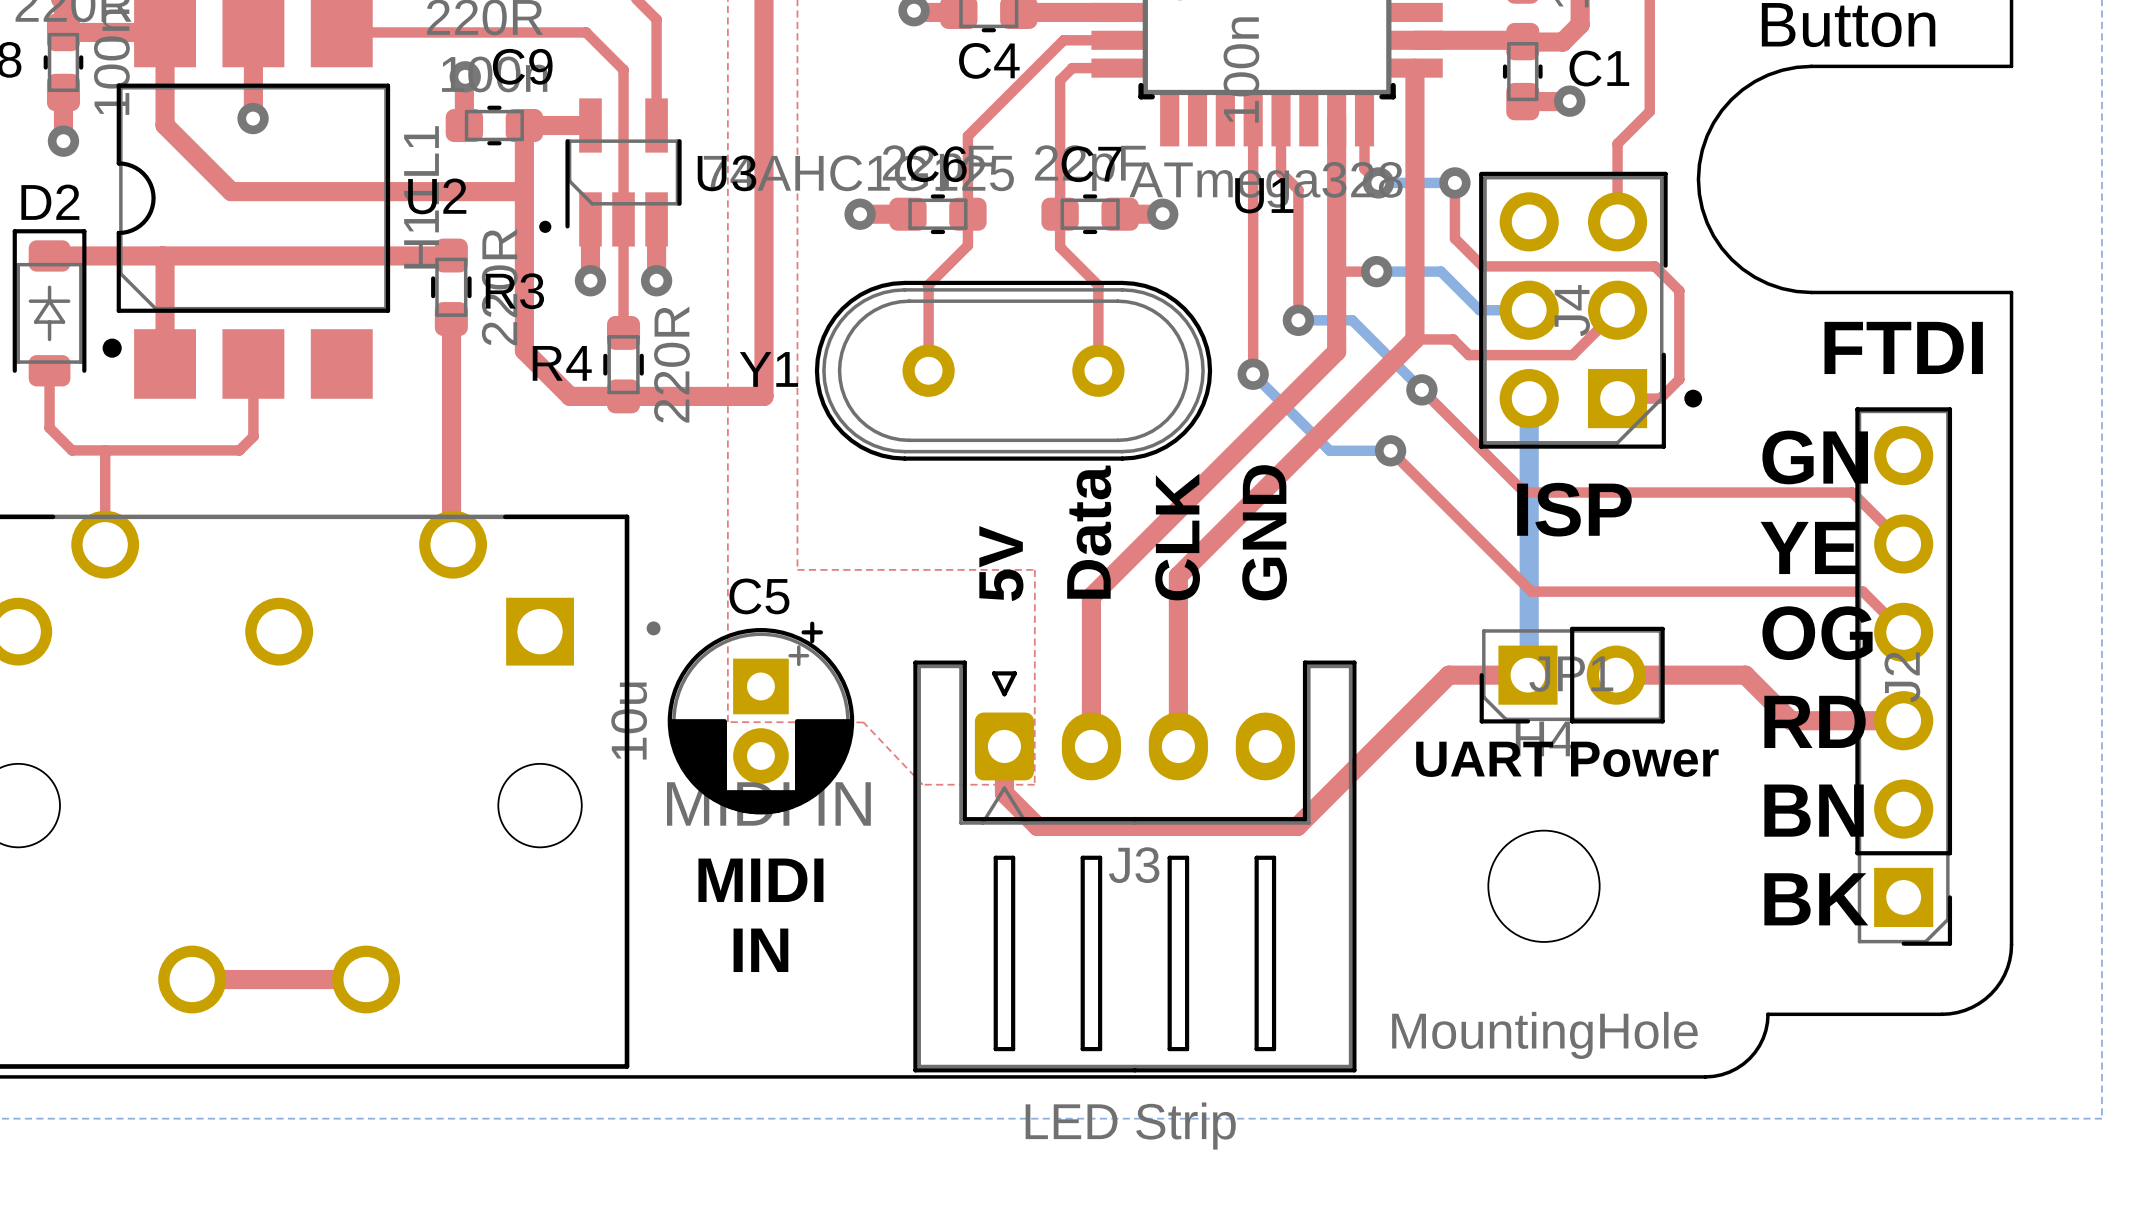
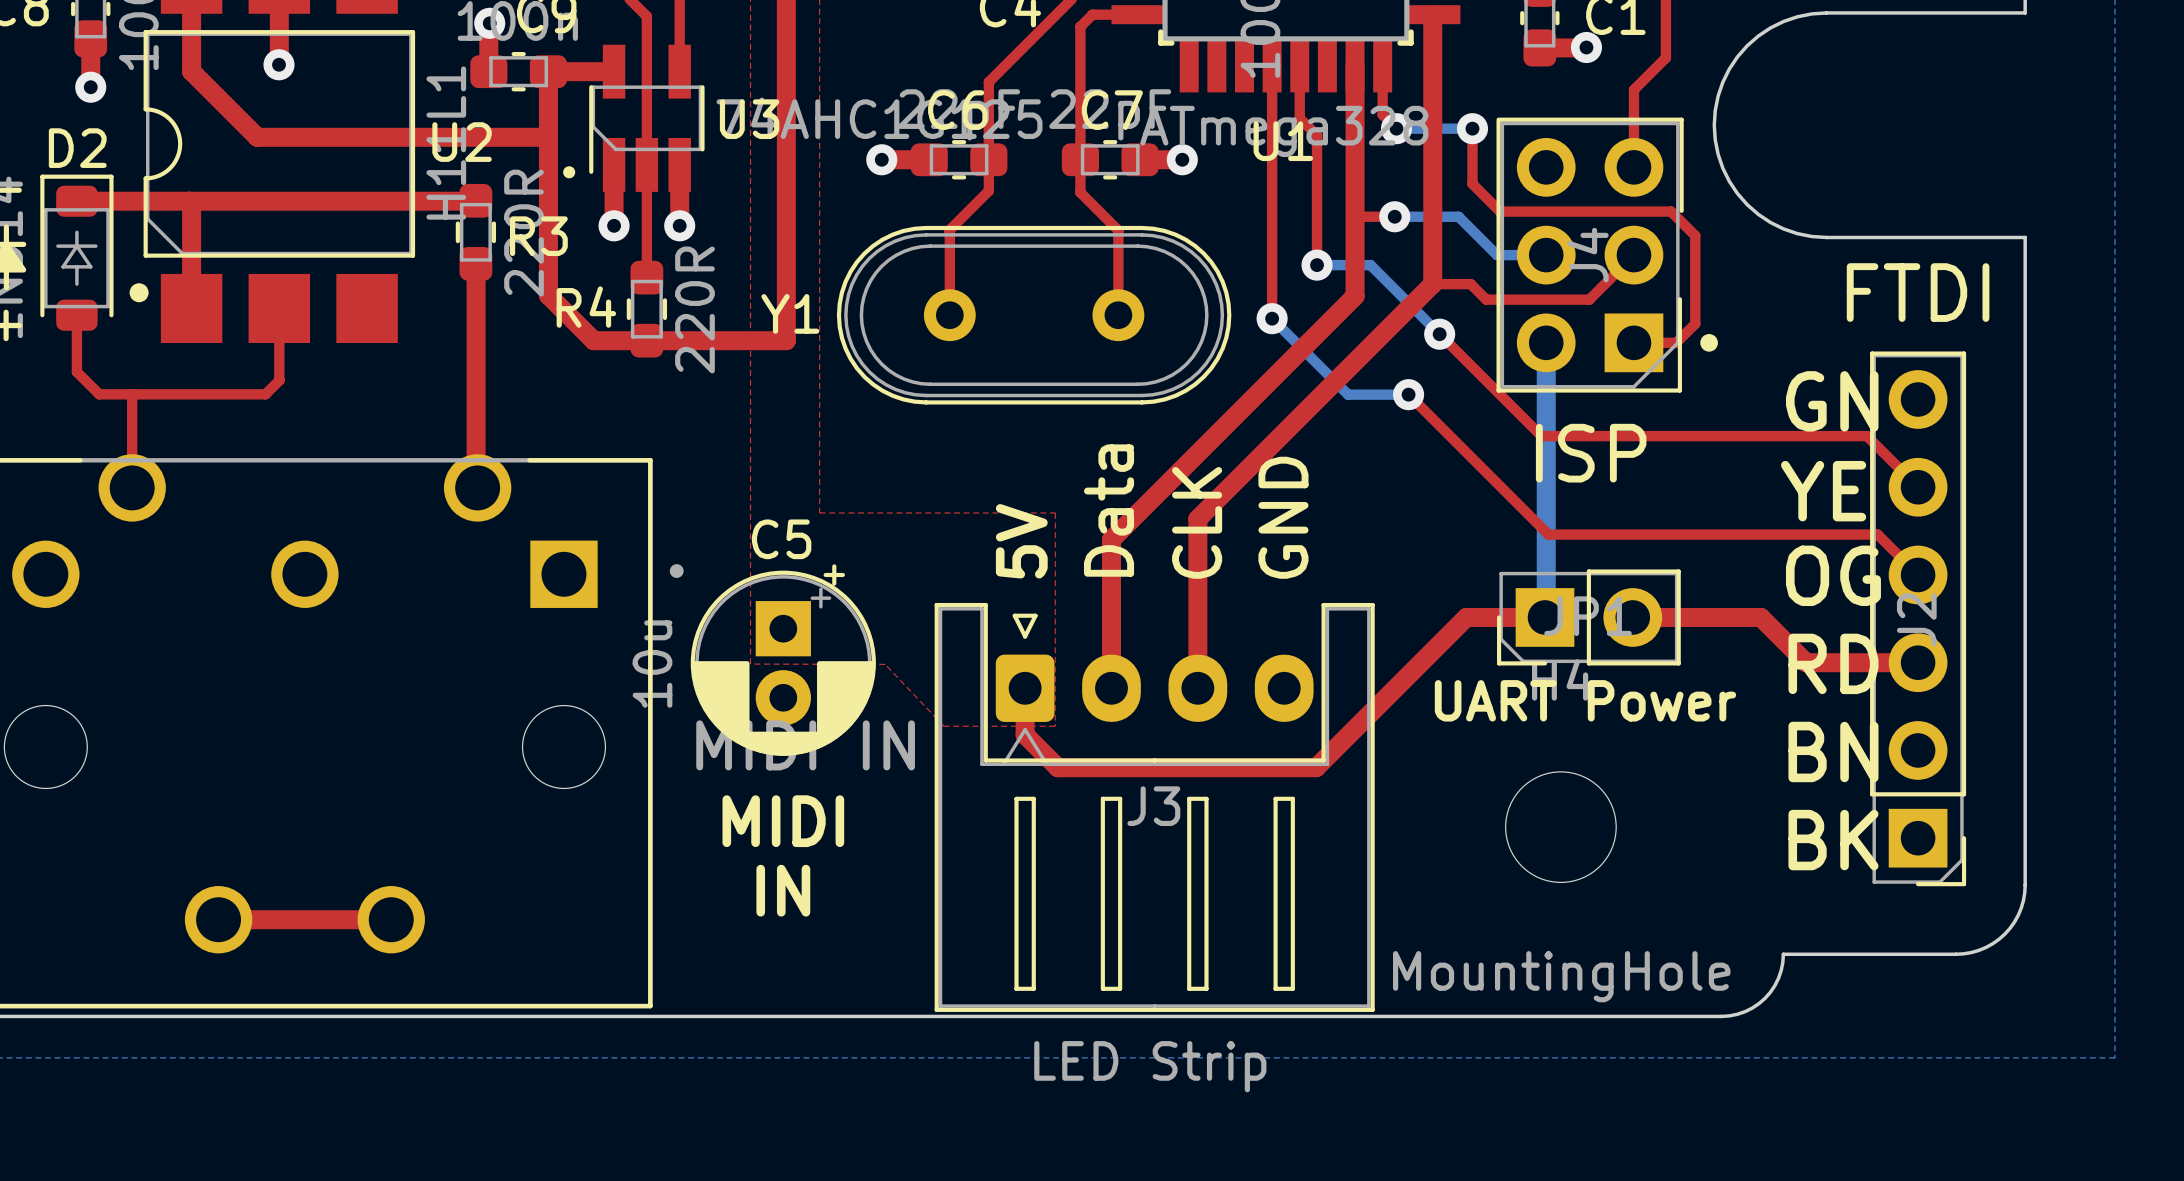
text position: Data (1089, 532) -> Data (1109, 510)
text position: GND (1264, 532) -> GND (1283, 517)
text position: CLK (1177, 537) -> CLK (1197, 522)
text position: 5V (1001, 563) -> 5V (1021, 541)

